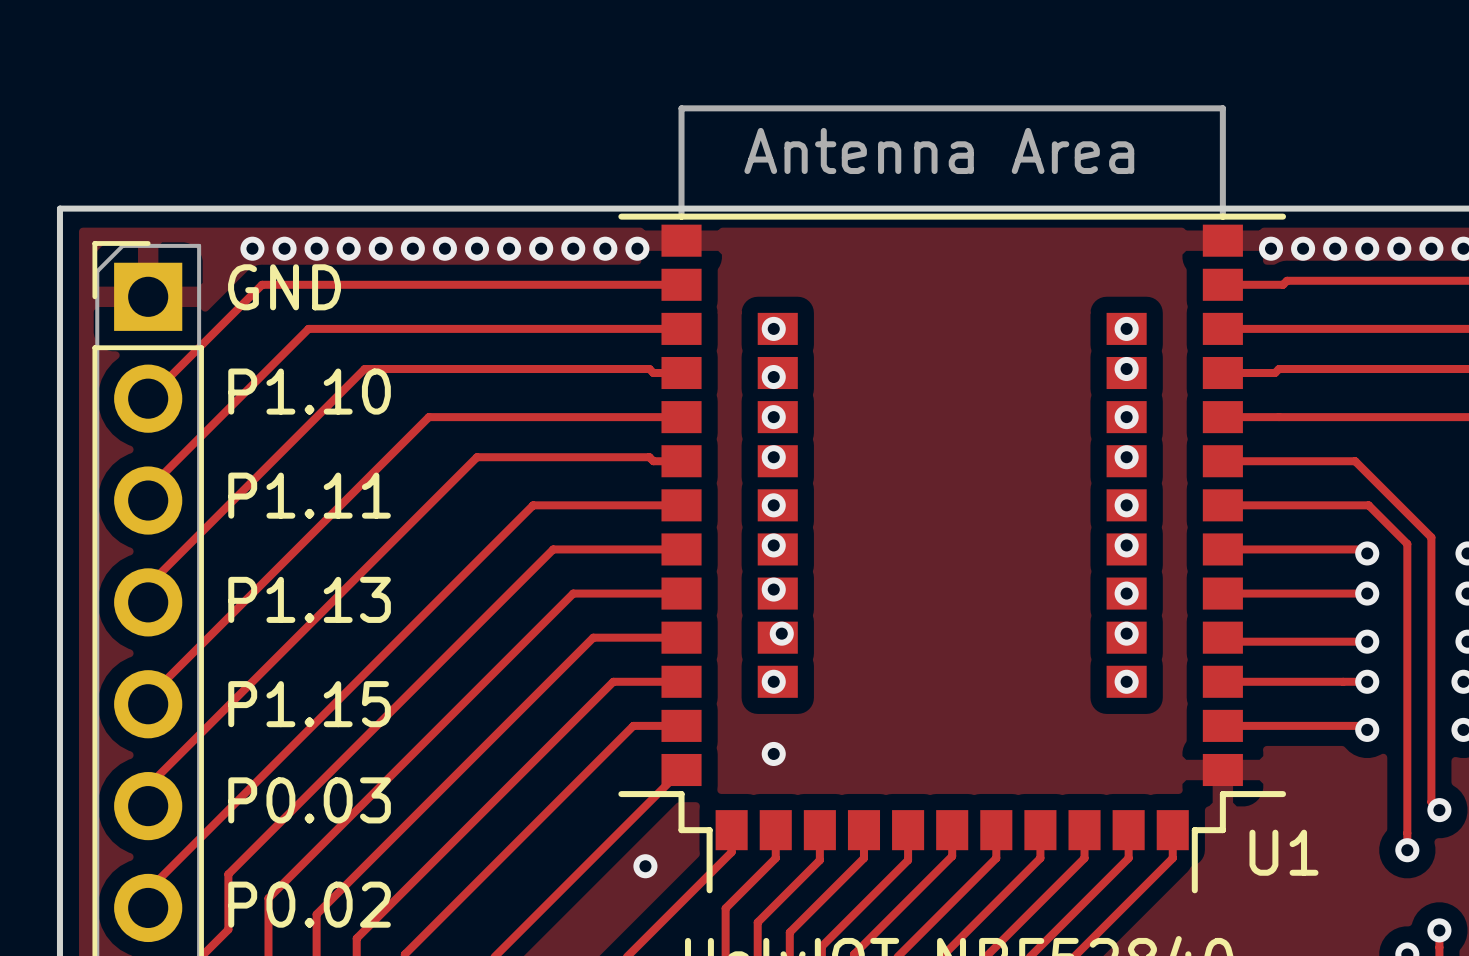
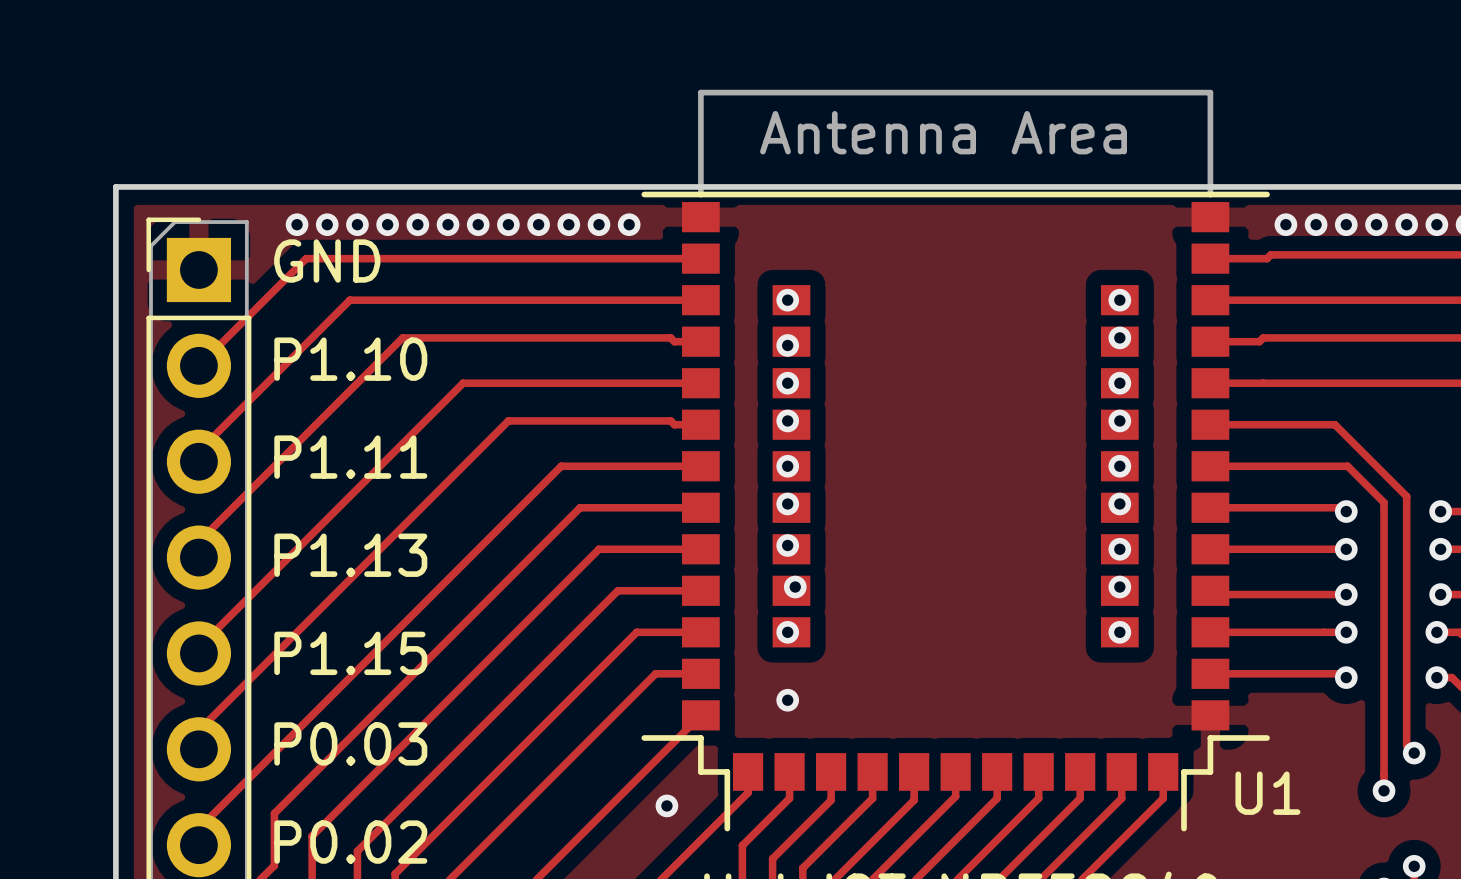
via: (637, 248) -> none
via: (1270, 248) -> none

